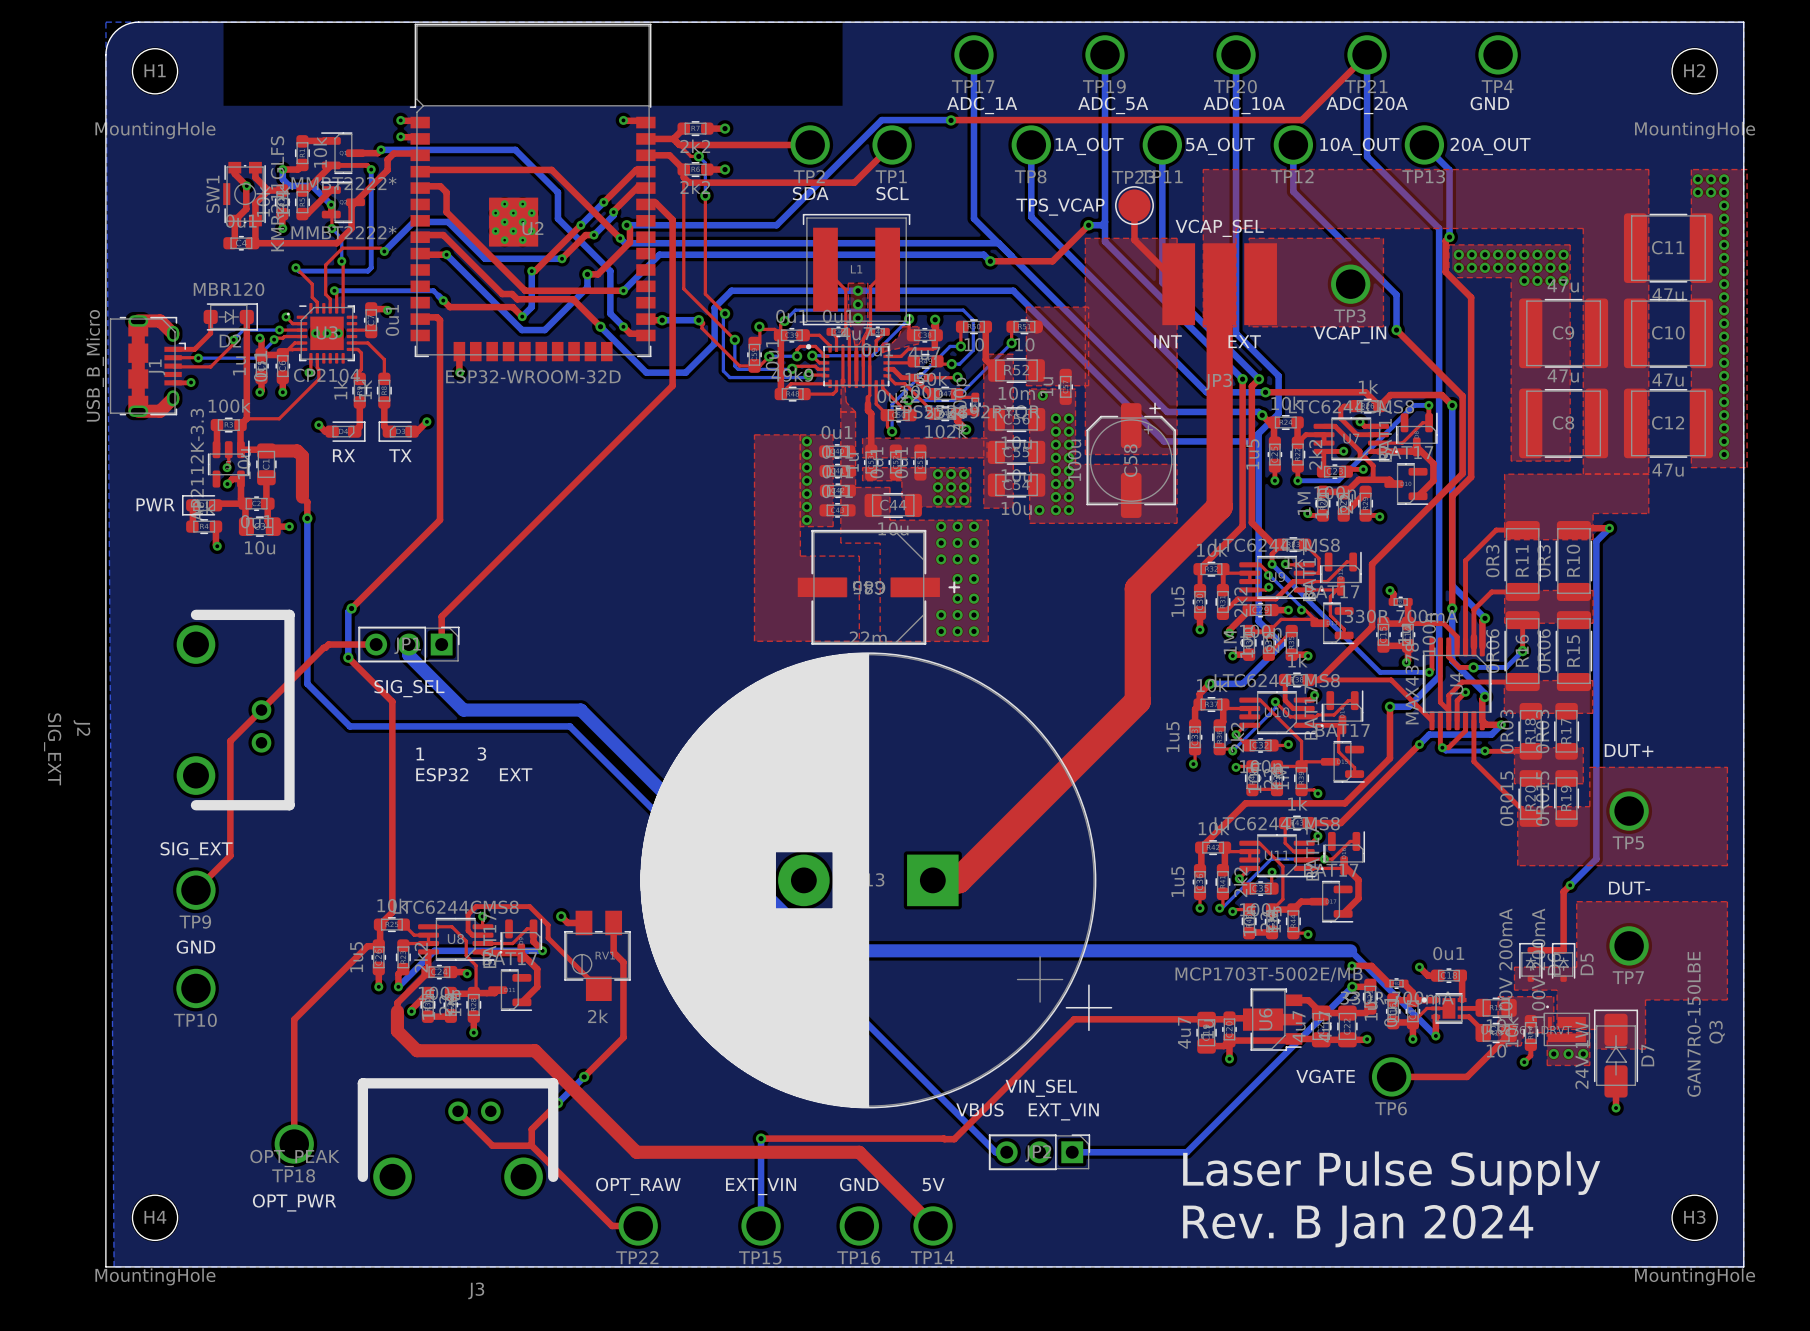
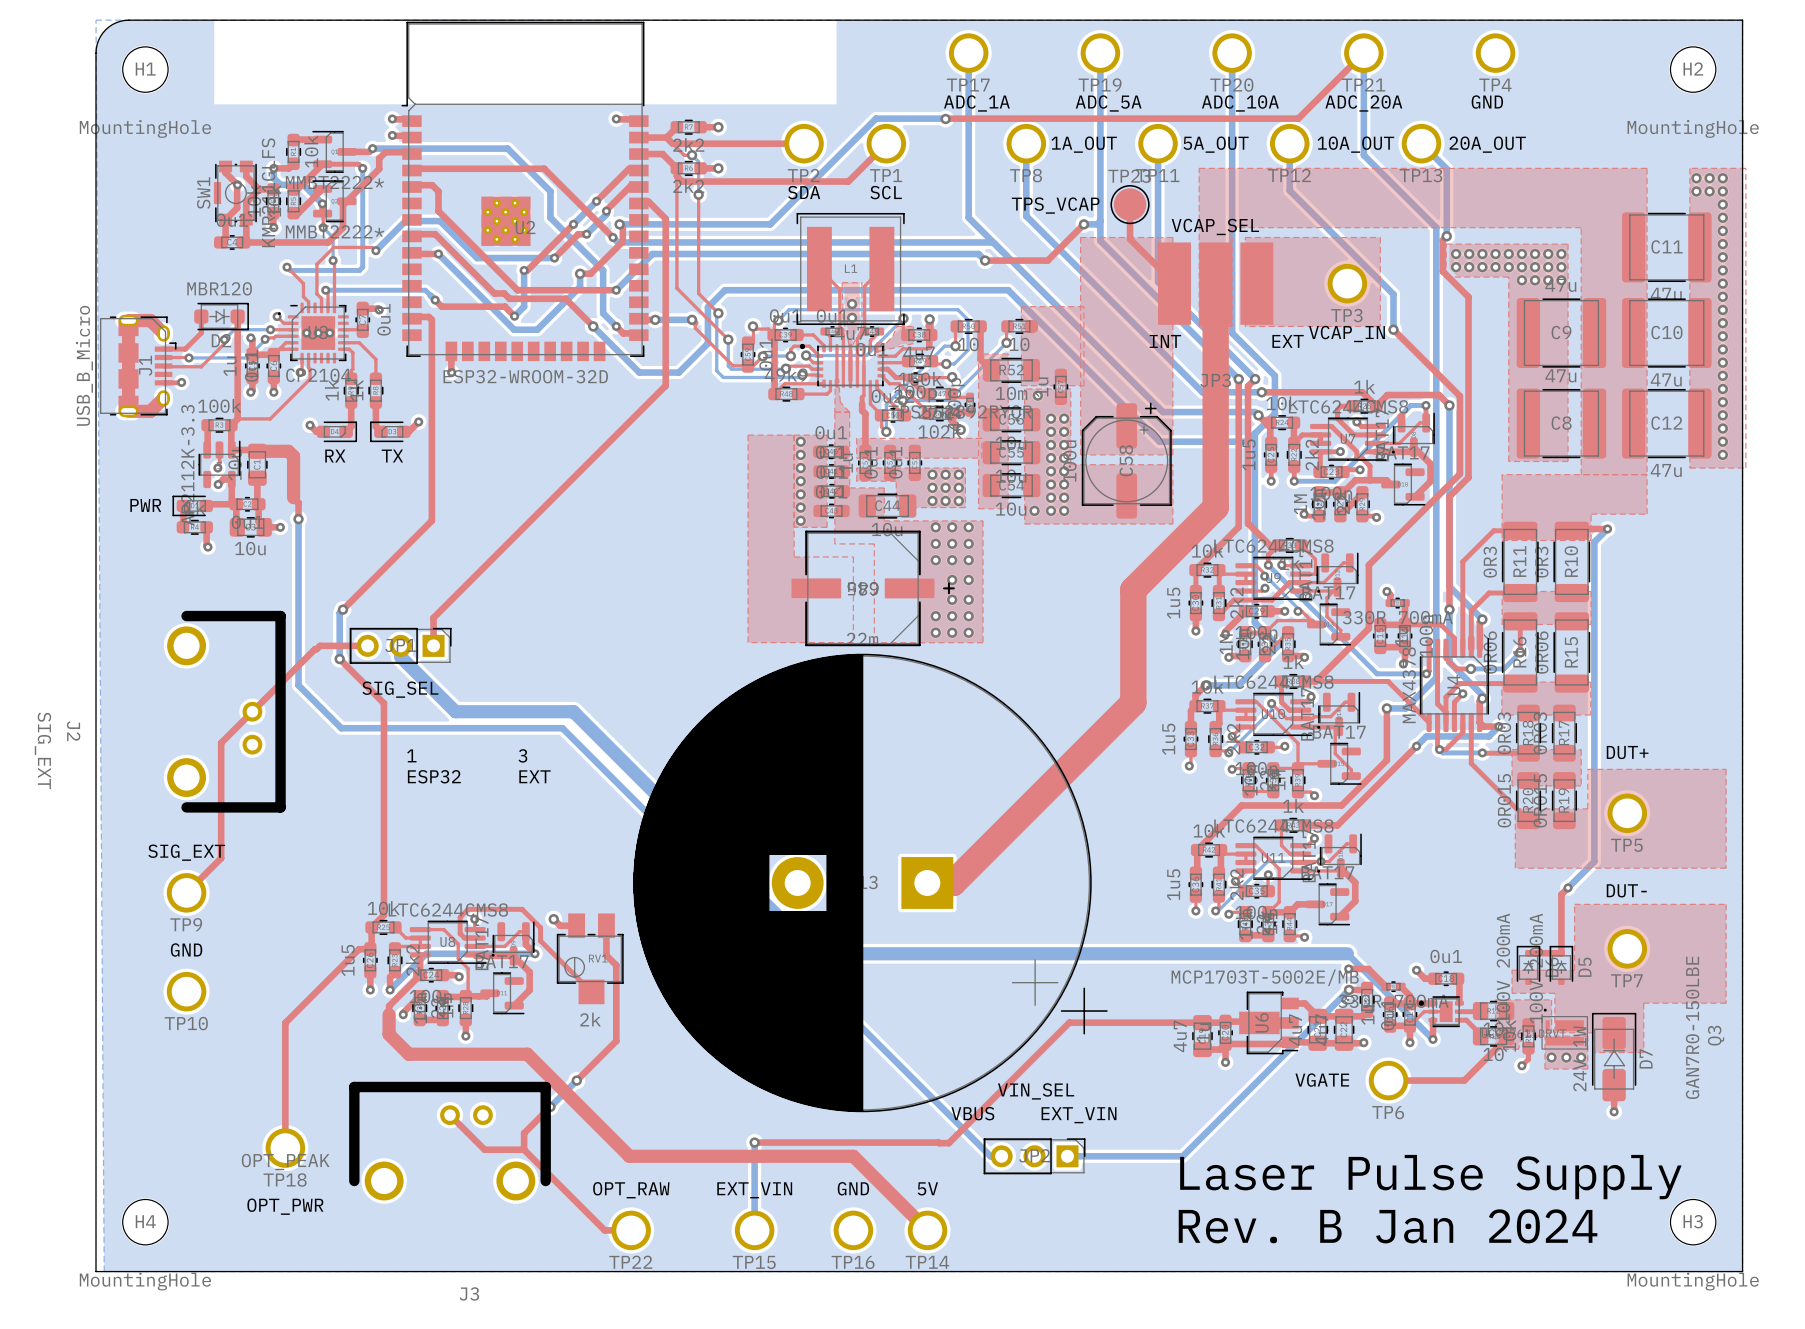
via: (858, 290) -> none

